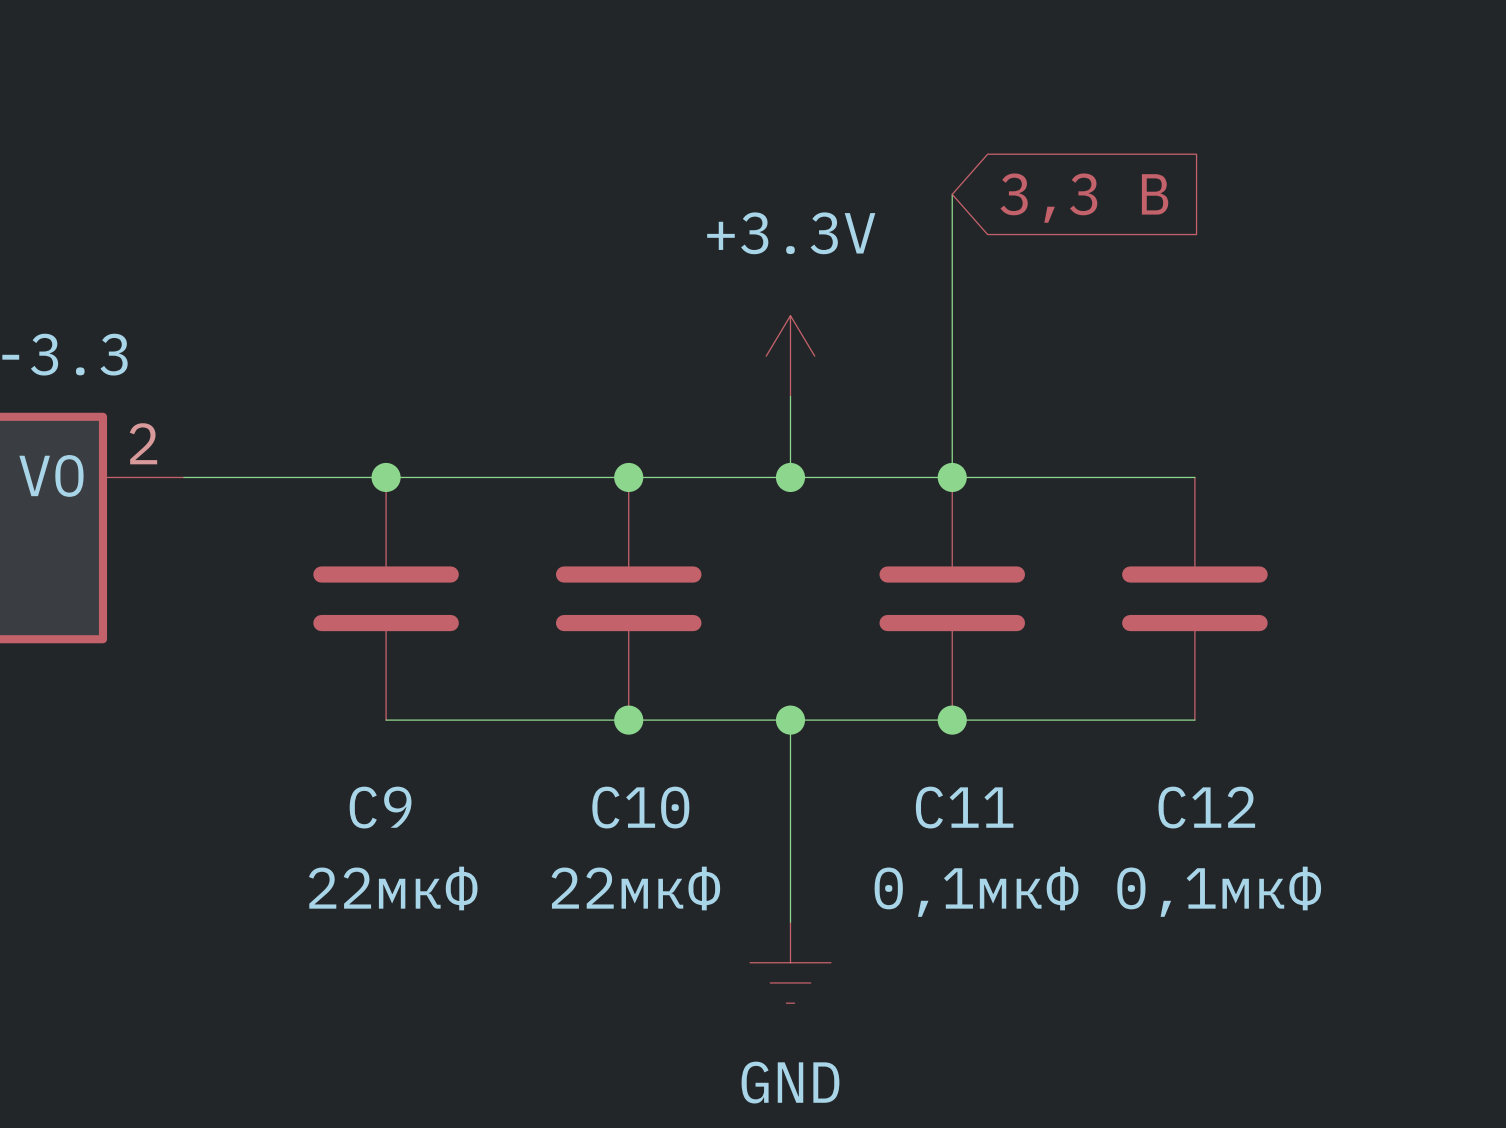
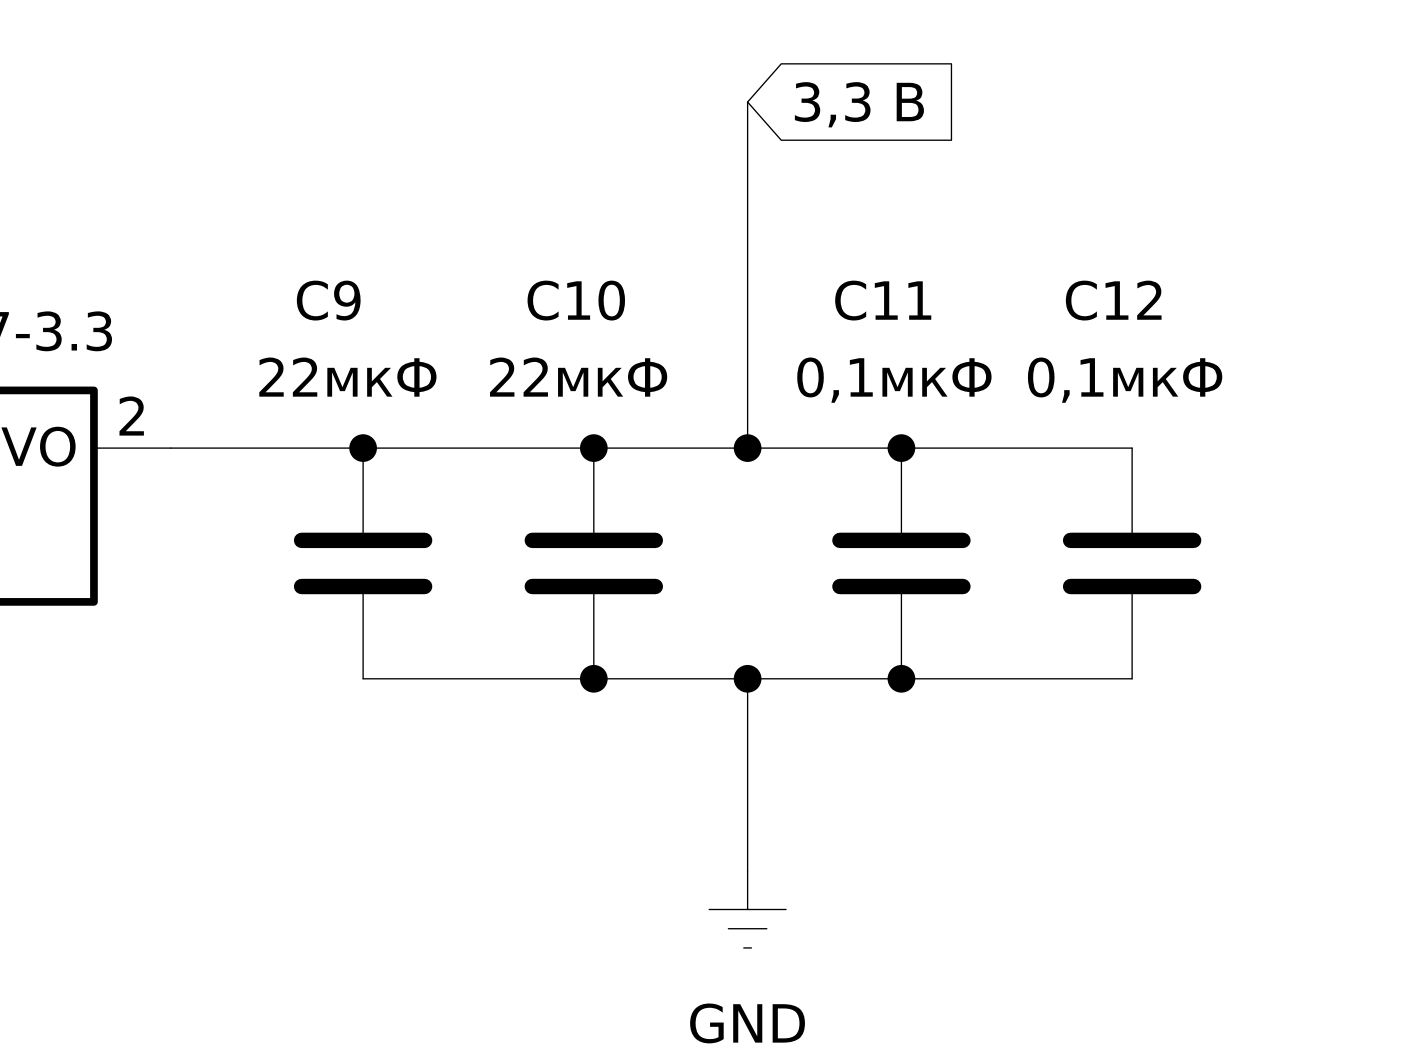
wire: (952, 194) (952, 477) -> (747, 102) (747, 371)
global label position: 3,3 В (1084, 198) -> 3,3 В (859, 104)
power symbol: +3.3V (790, 356) -> none
C9 name position: C9 (380, 807) -> C9 (328, 300)
C10 name position: C10 (640, 807) -> C10 (576, 300)
C11 name position: C11 (964, 807) -> C11 (883, 300)
C12 name position: C12 (1206, 807) -> C12 (1113, 300)
C9 value position: 22мкФ (393, 888) -> 22мкФ (347, 377)
C10 value position: 22мкФ (635, 888) -> 22мкФ (578, 377)
C11 value position: 0,1мкФ (976, 891) -> 0,1мкФ (894, 380)
C12 value position: 0,1мкФ (1219, 891) -> 0,1мкФ (1125, 380)

